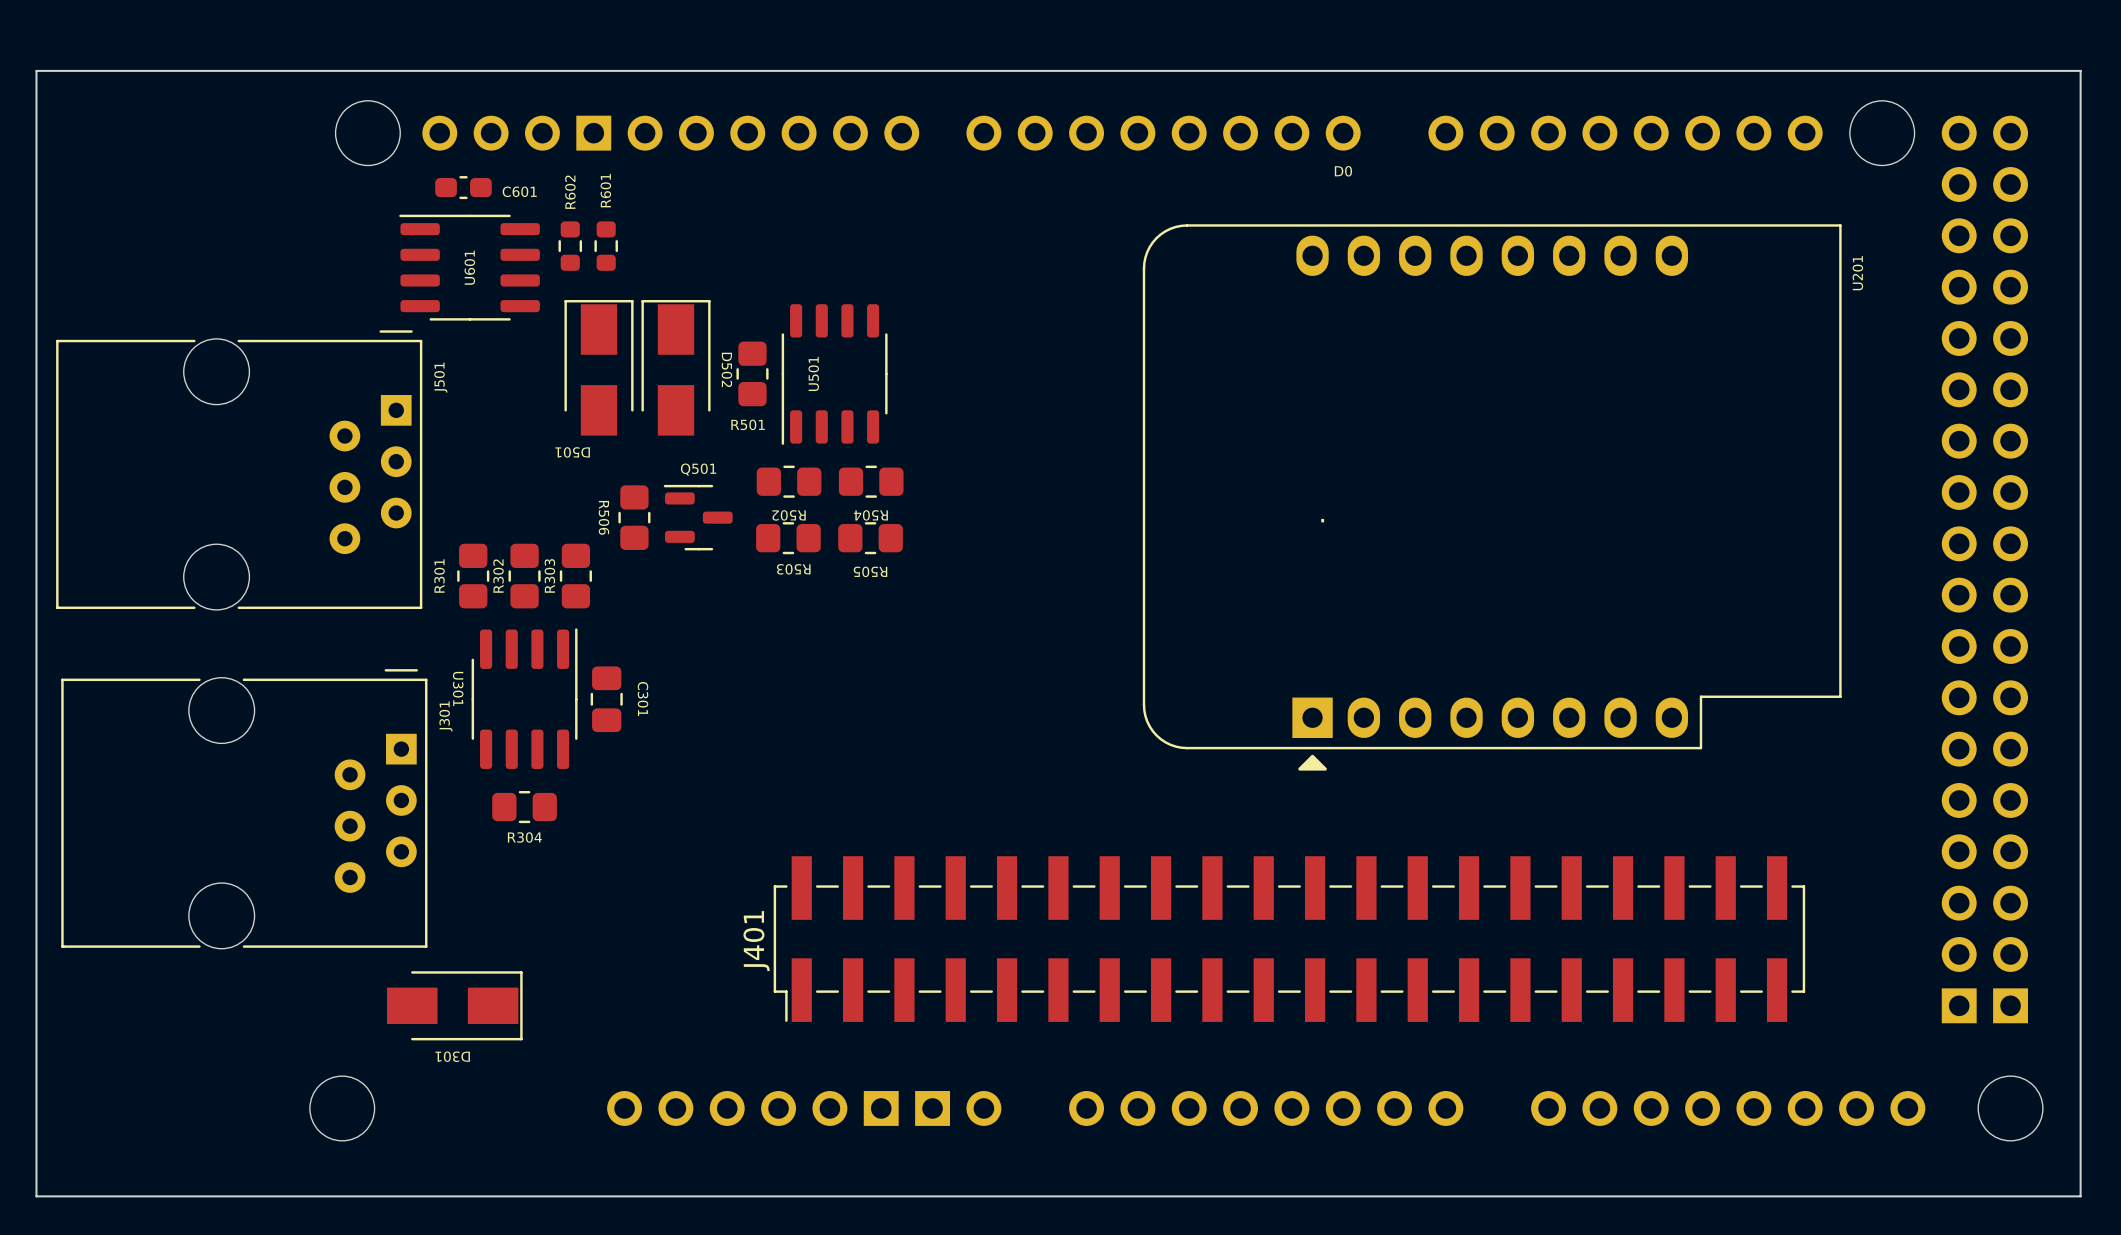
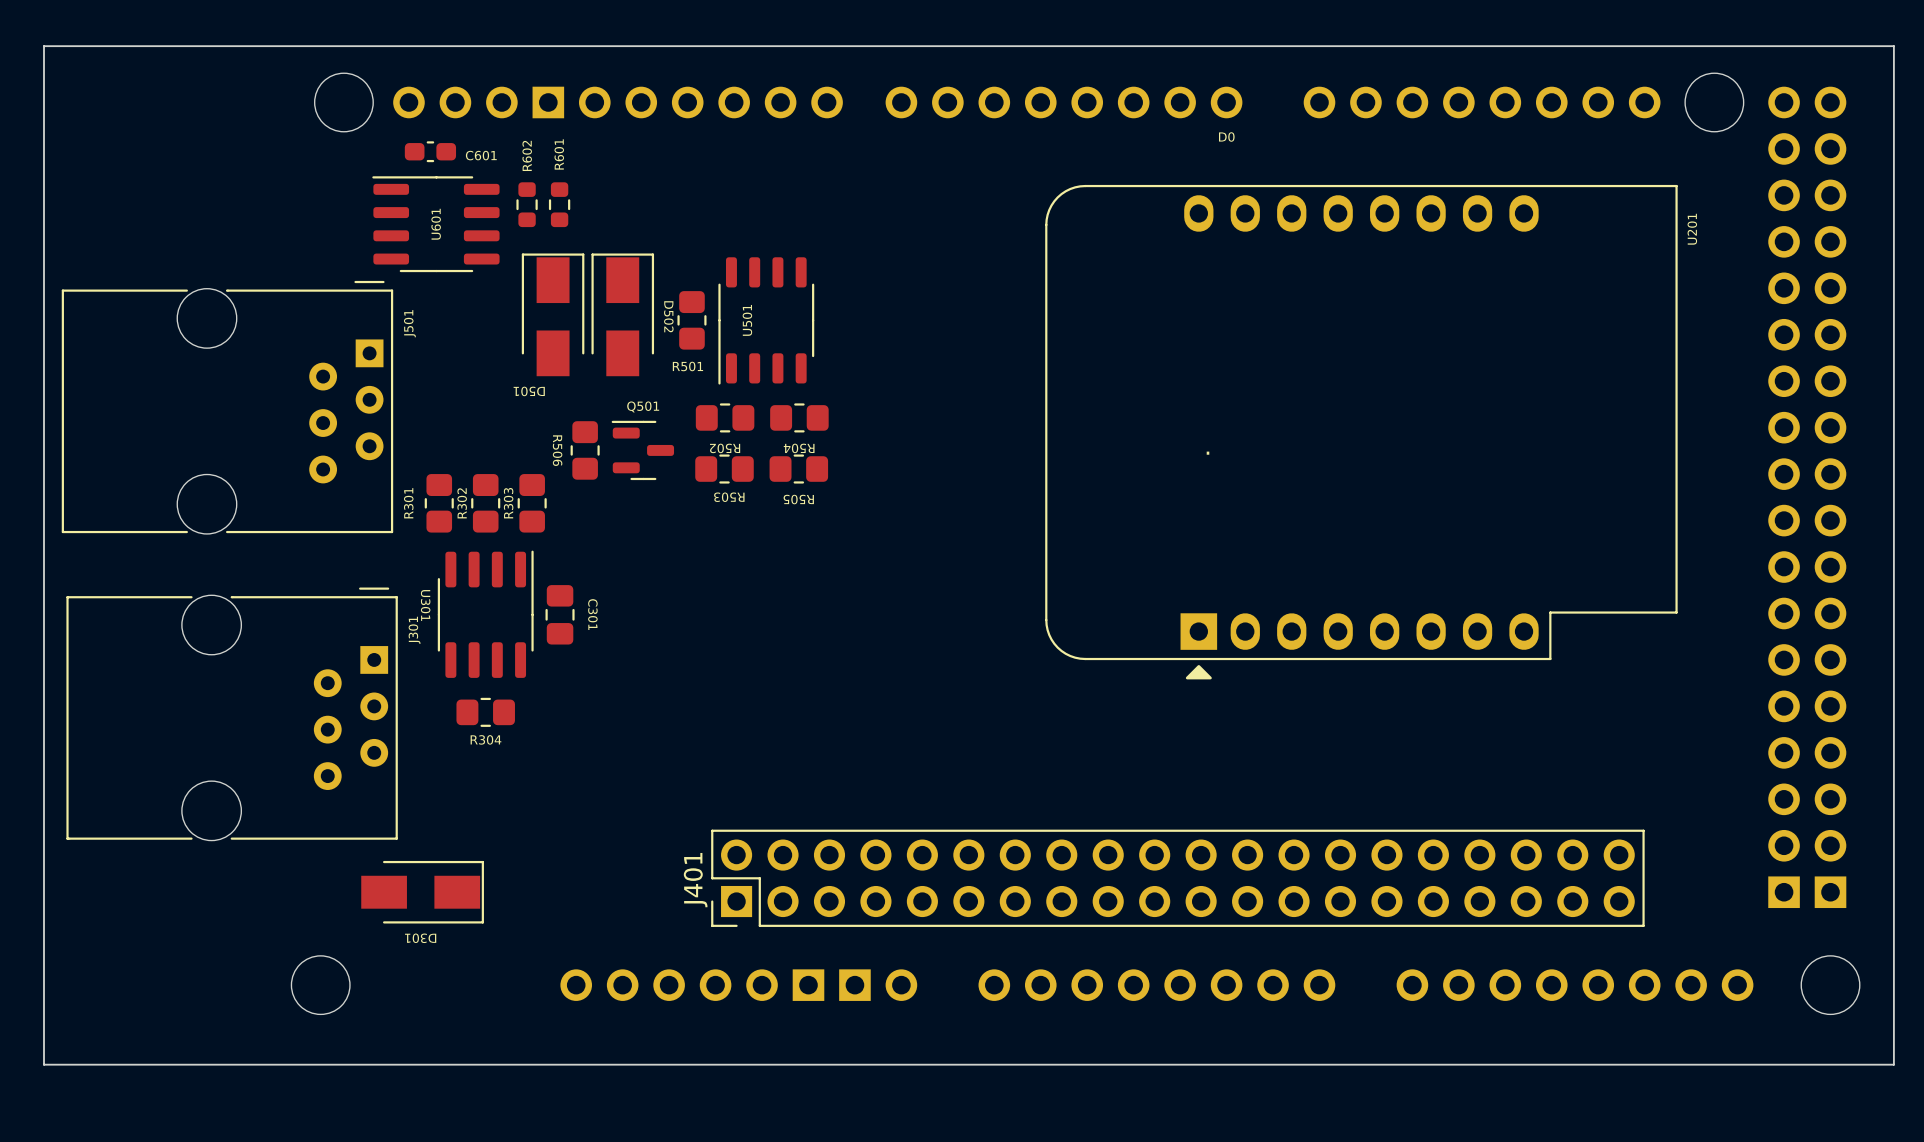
J401 footprint: [773, 856, 1806, 1022] -> [711, 829, 1645, 927]

